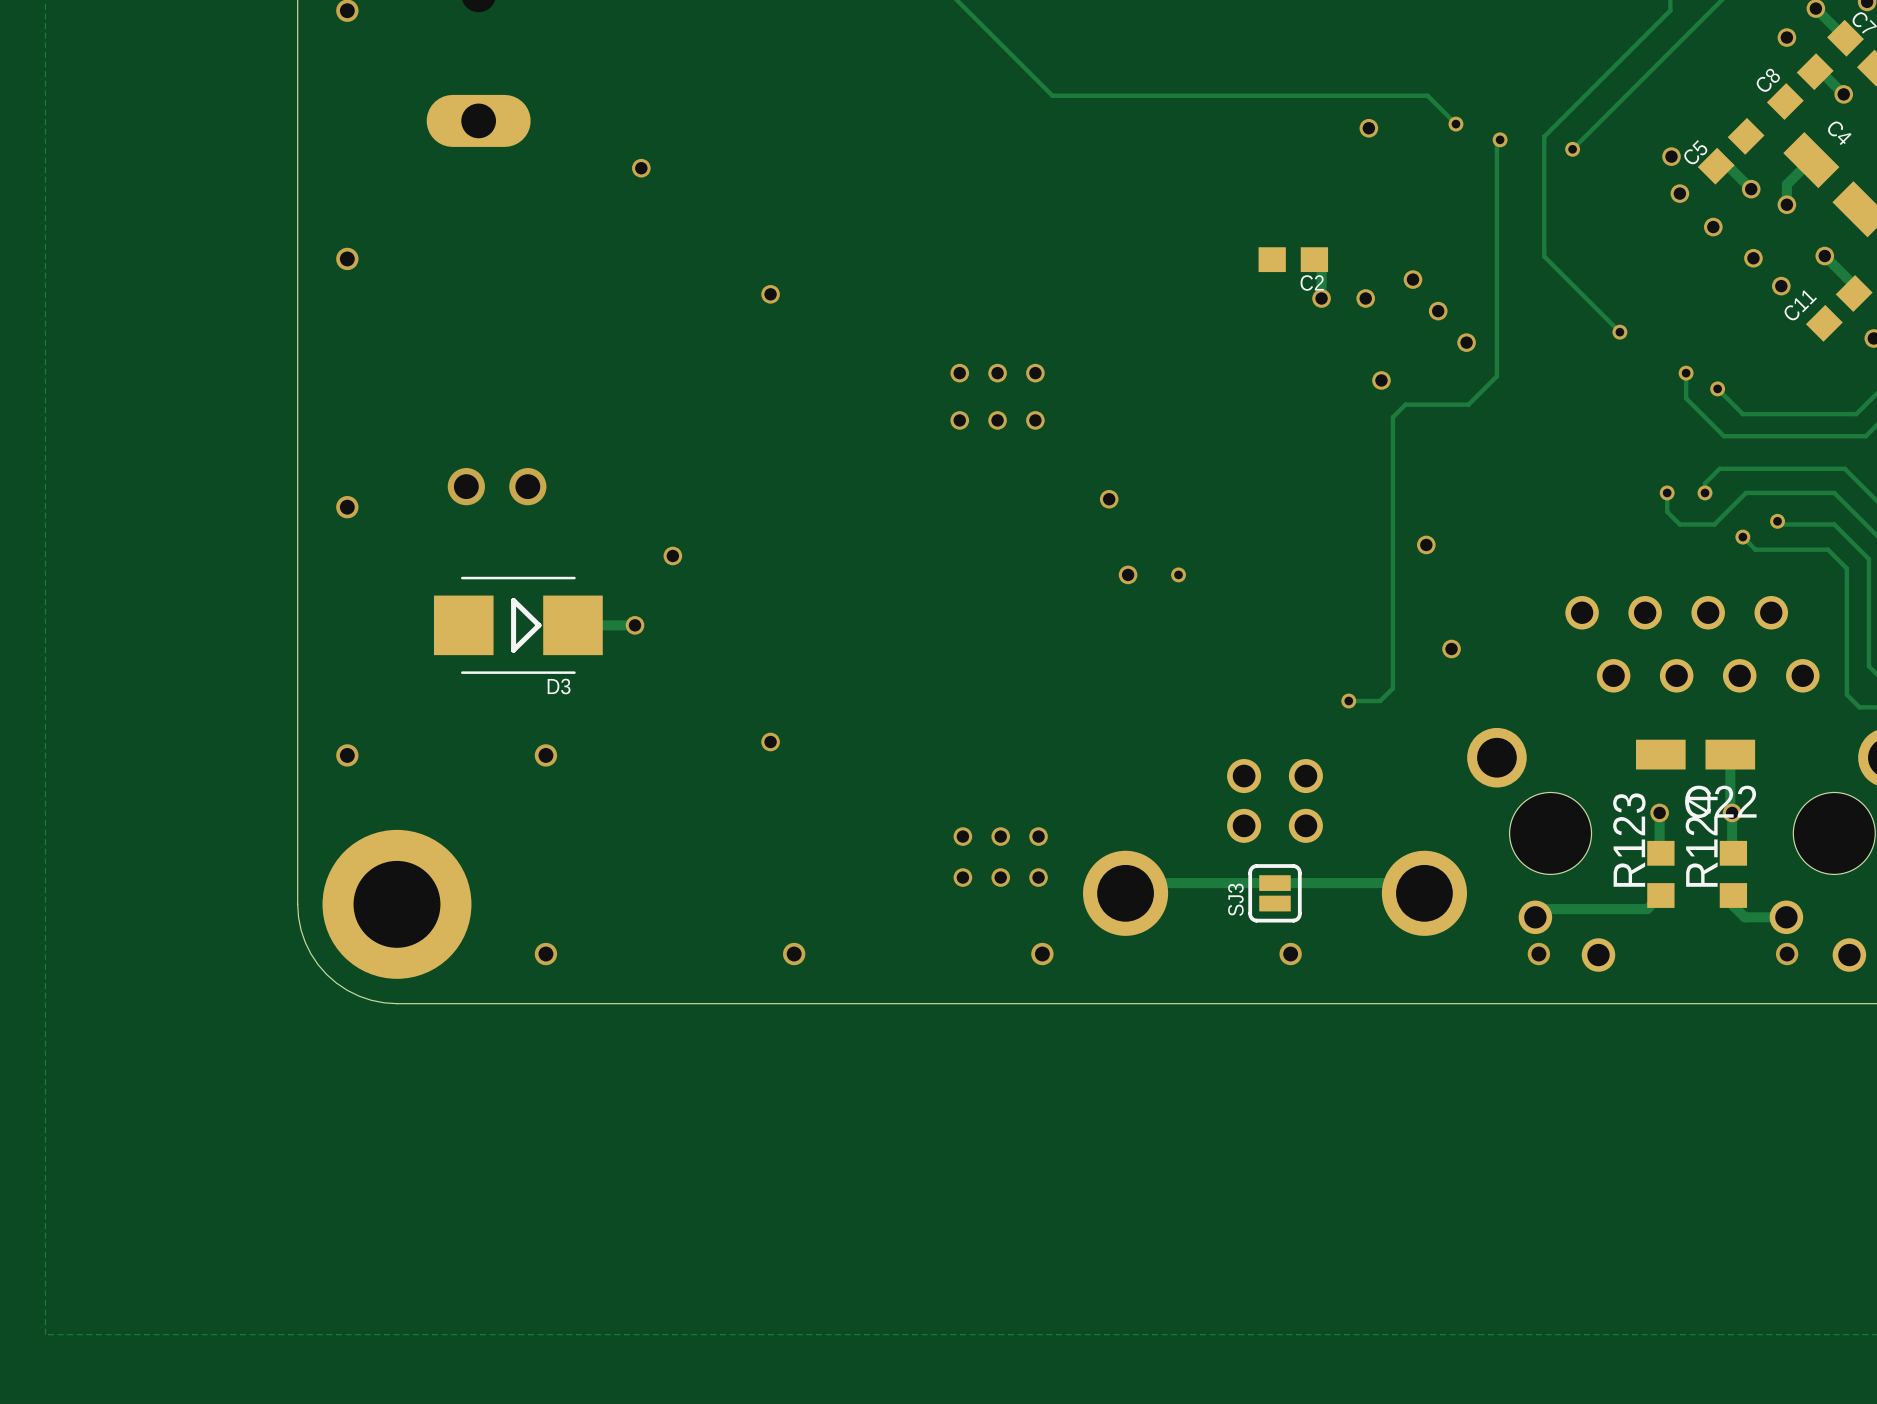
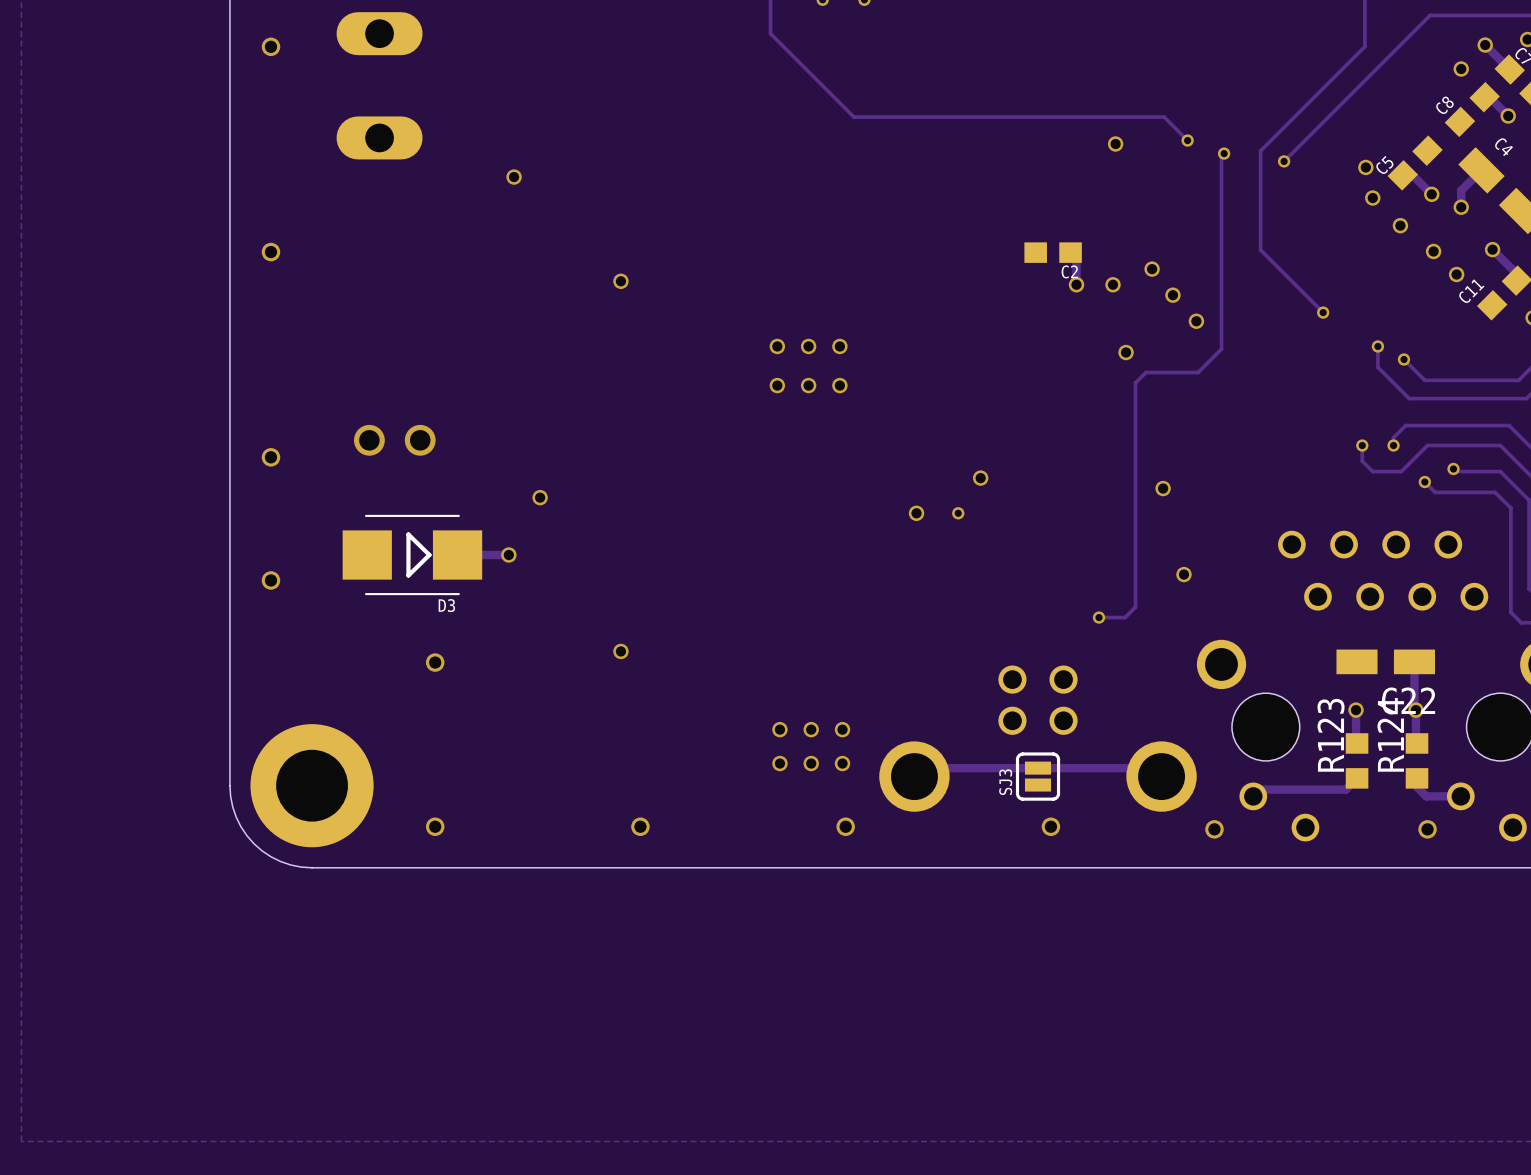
via position: (1109, 499) -> (980, 478)
via position: (347, 755) -> (270, 580)
via position: (1538, 954) -> (1214, 829)
via position: (1787, 954) -> (1427, 829)

